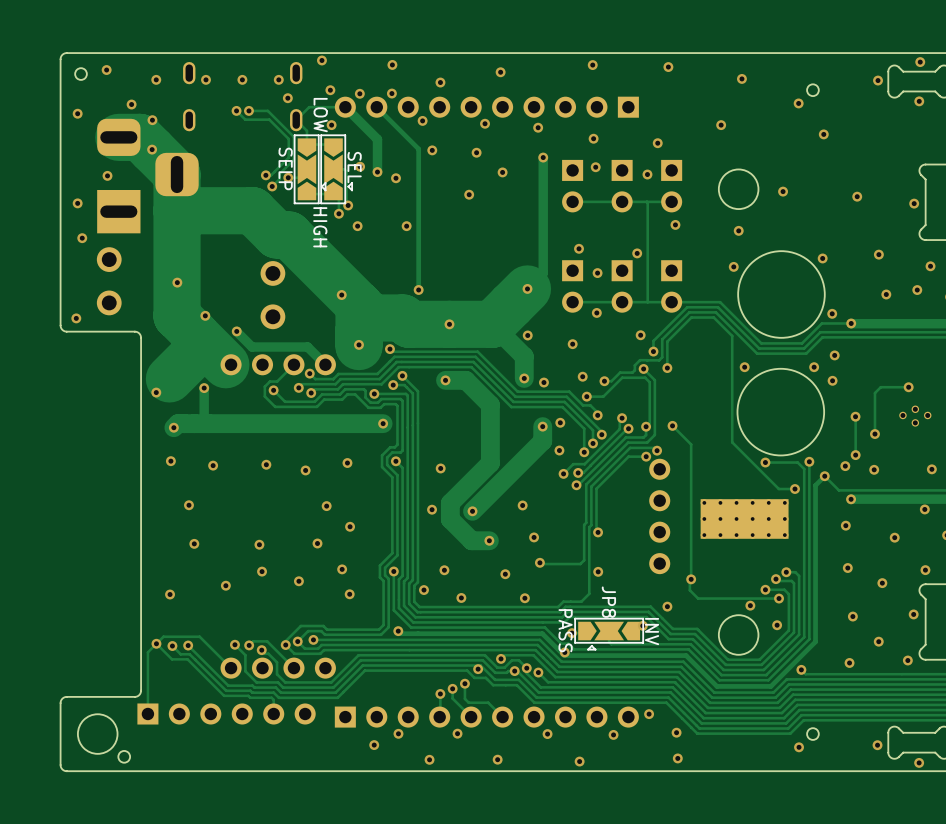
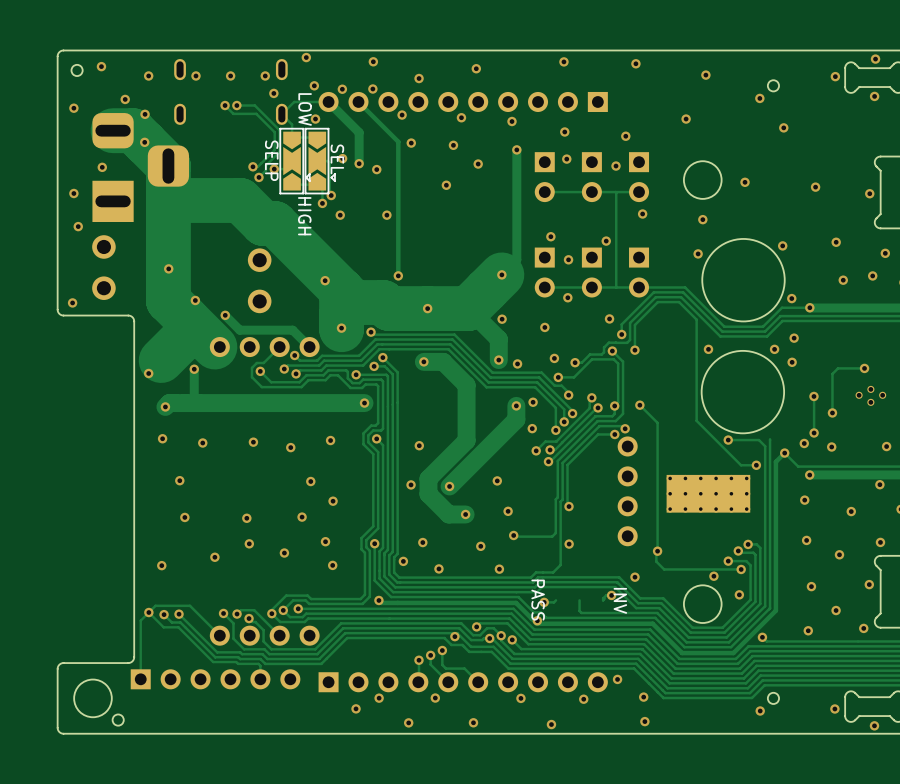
via: (809, 461) -> none
JP8: (609, 634) -> none

